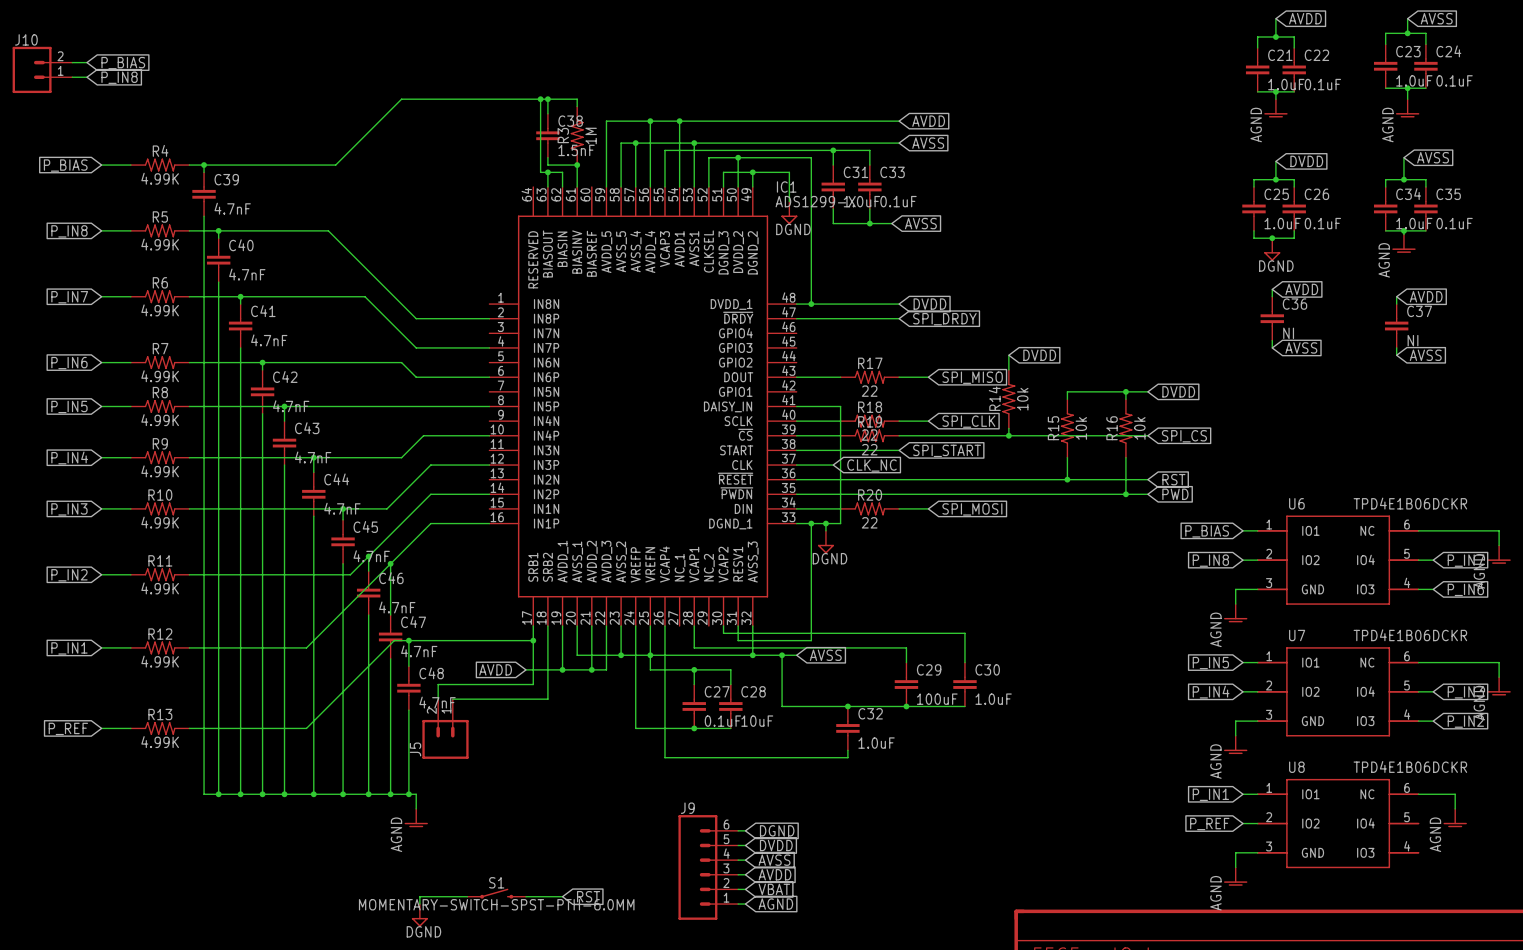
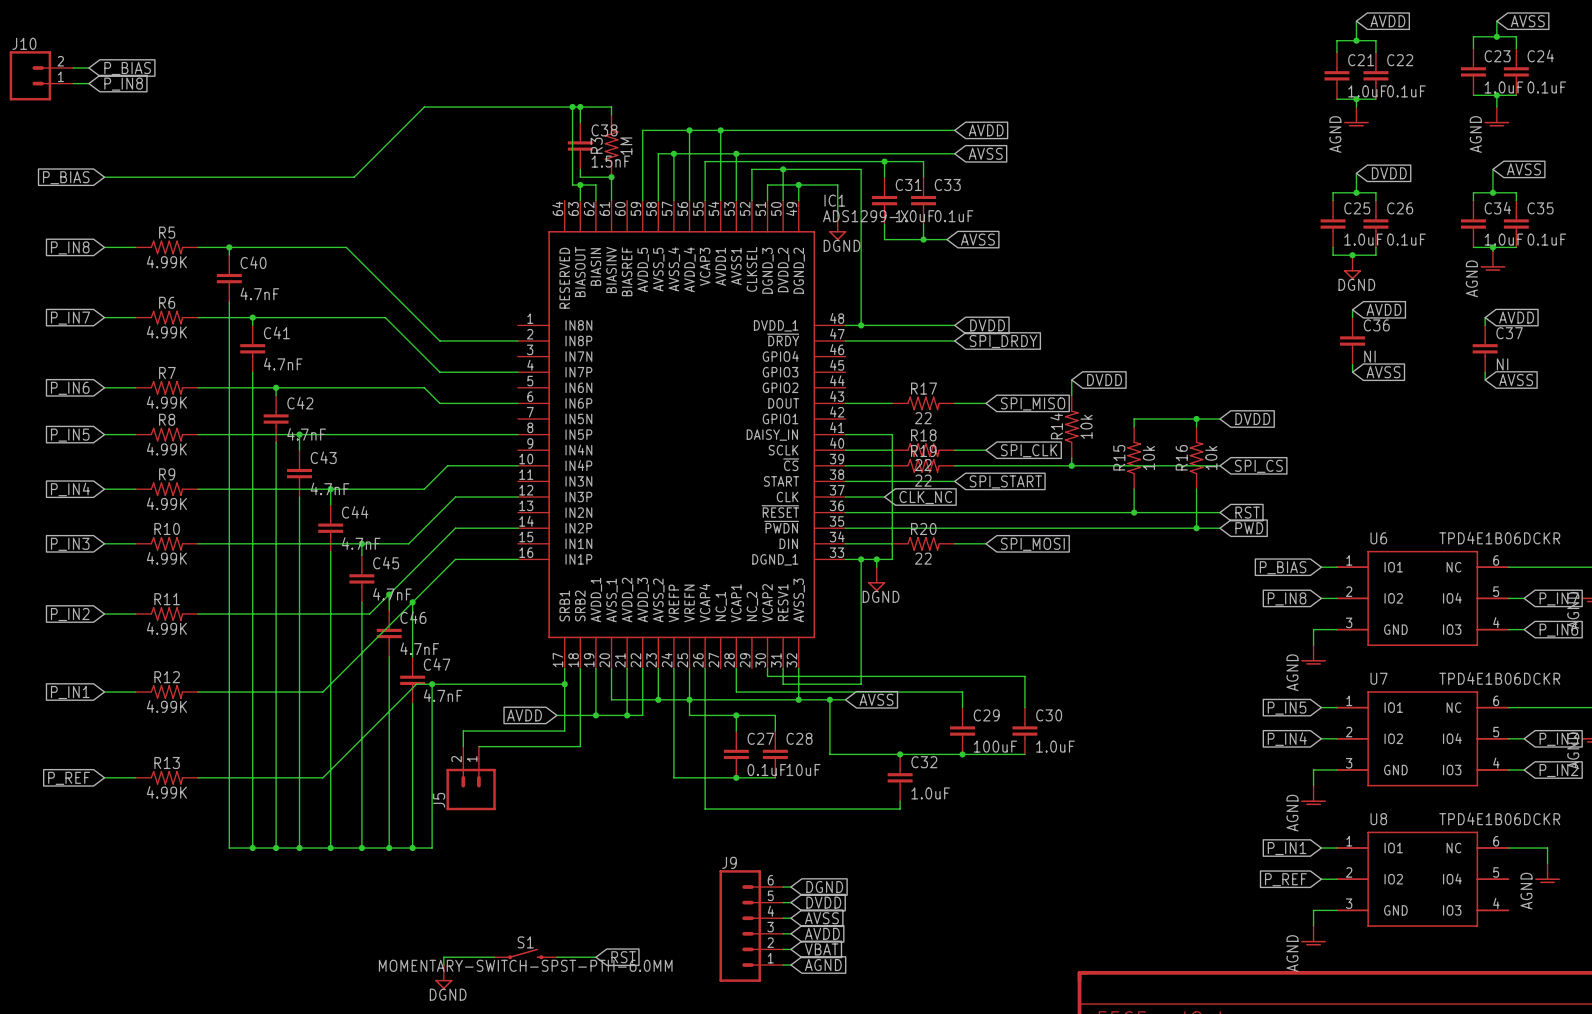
R4: 4.99K (160, 165) -> none
wire: (204, 165) (204, 172) -> none
junction: (204, 165) -> none
C39: 4.7nF (204, 194) -> none
wire: (204, 216) (204, 794) (218, 794) -> none
C48: 4.7nF (408, 688) -> none
junction: (218, 794) -> none
wire: (408, 794) (416, 794) (416, 808) -> none
junction: (408, 794) -> none
power symbol: AGND (416, 818) -> none

